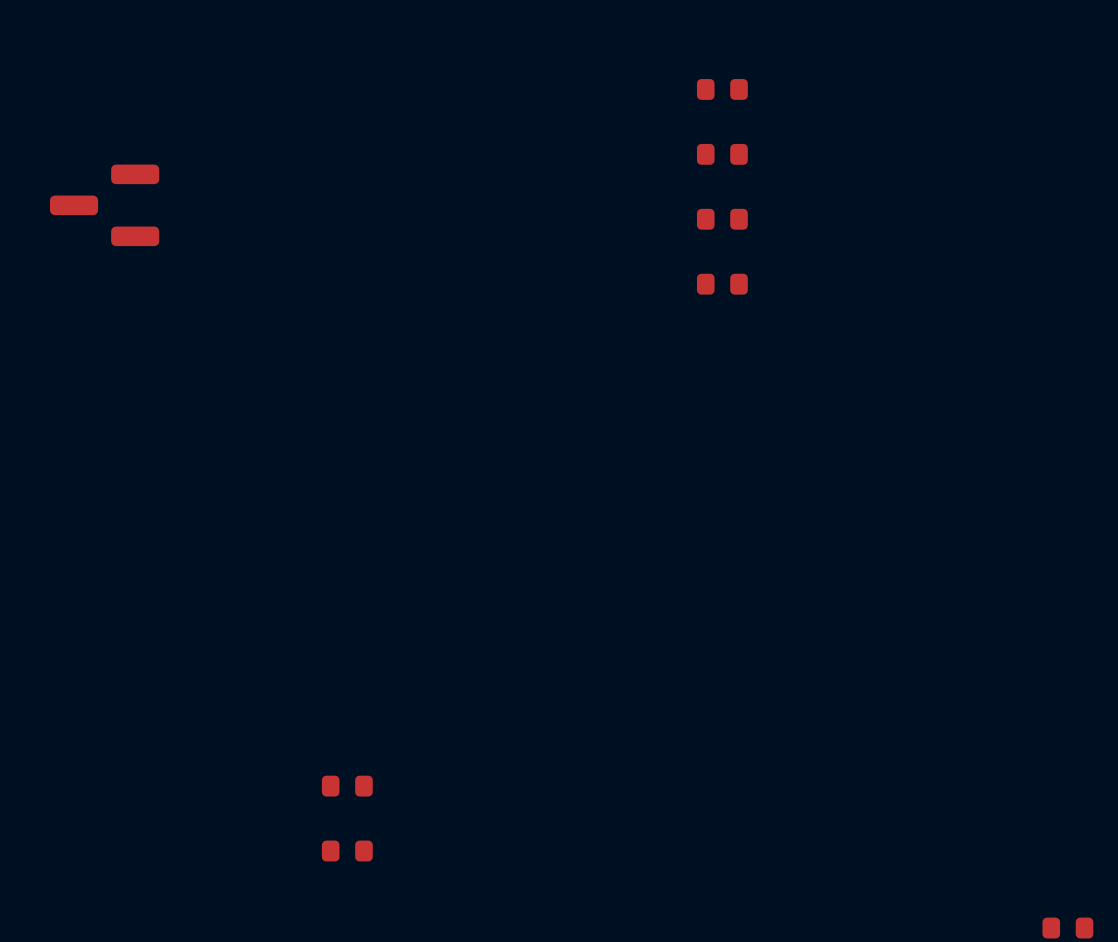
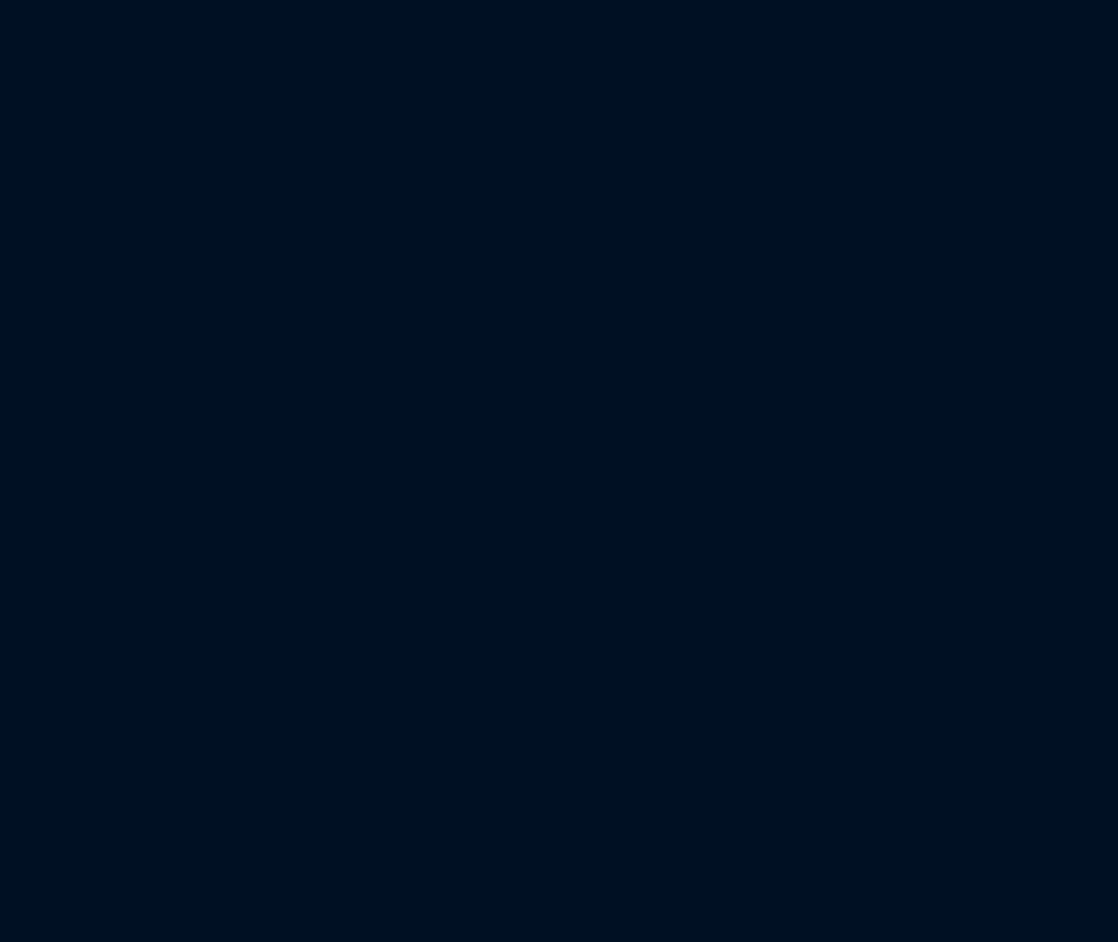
part: (722, 89) -> none
part: (722, 154) -> none
part: (104, 205) -> none
part: (722, 219) -> none
part: (722, 284) -> none
part: (347, 786) -> none
part: (347, 851) -> none
part: (1067, 928) -> none

